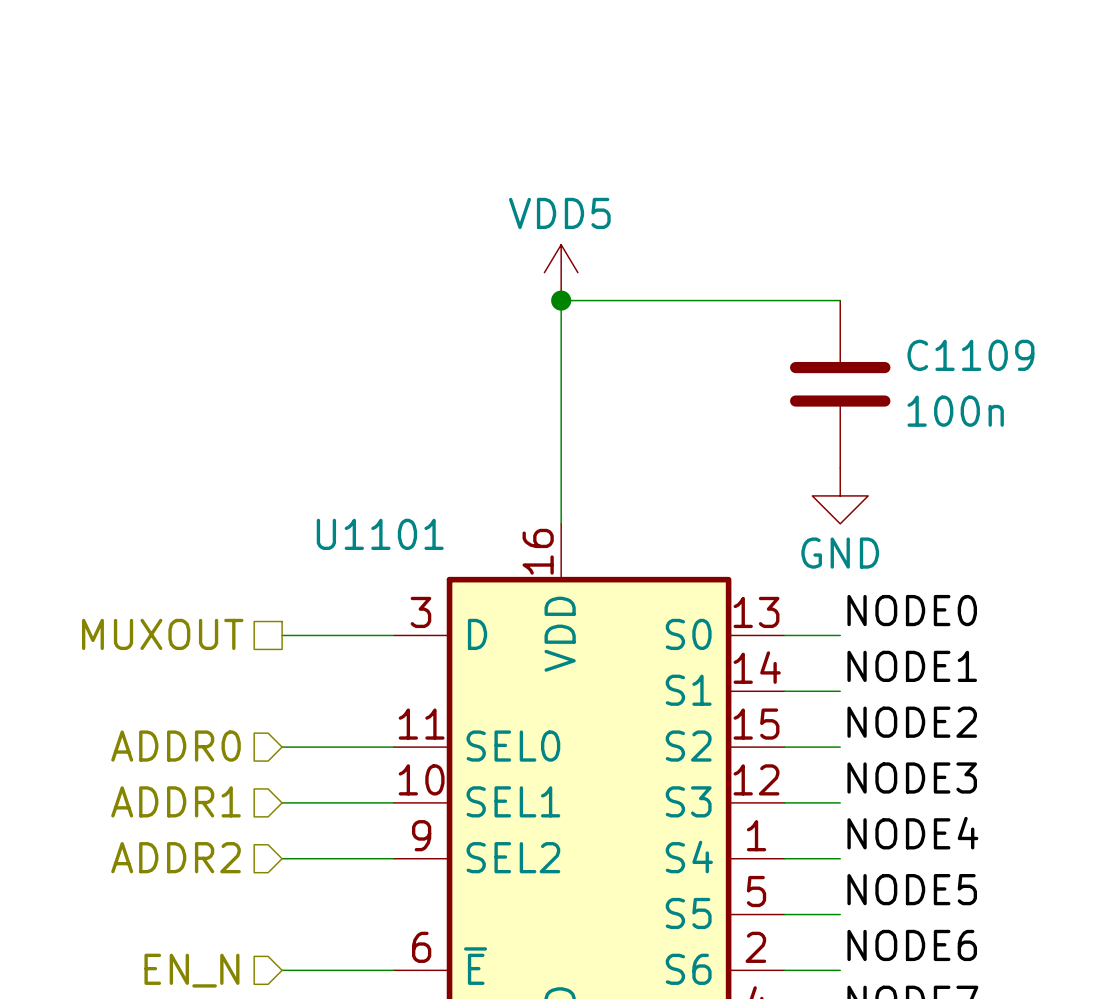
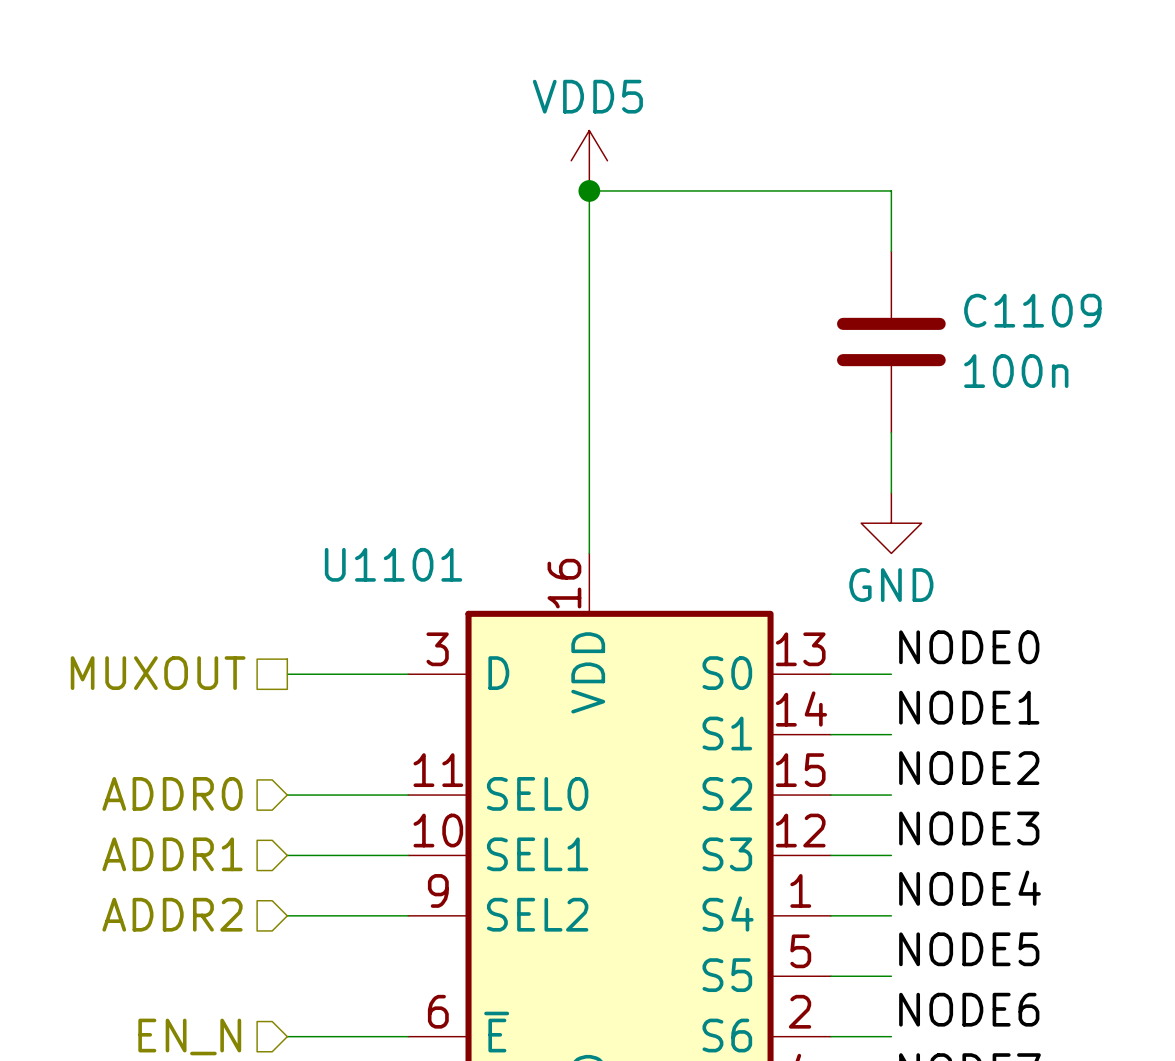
power symbol position: VDD5 (561, 272) -> VDD5 (589, 160)
wire: (561, 300) (840, 300) -> (589, 311) (589, 190) (891, 190) (891, 251)
junction position: (561, 300) -> (589, 190)
C1109 position: (840, 384) -> (891, 342)

